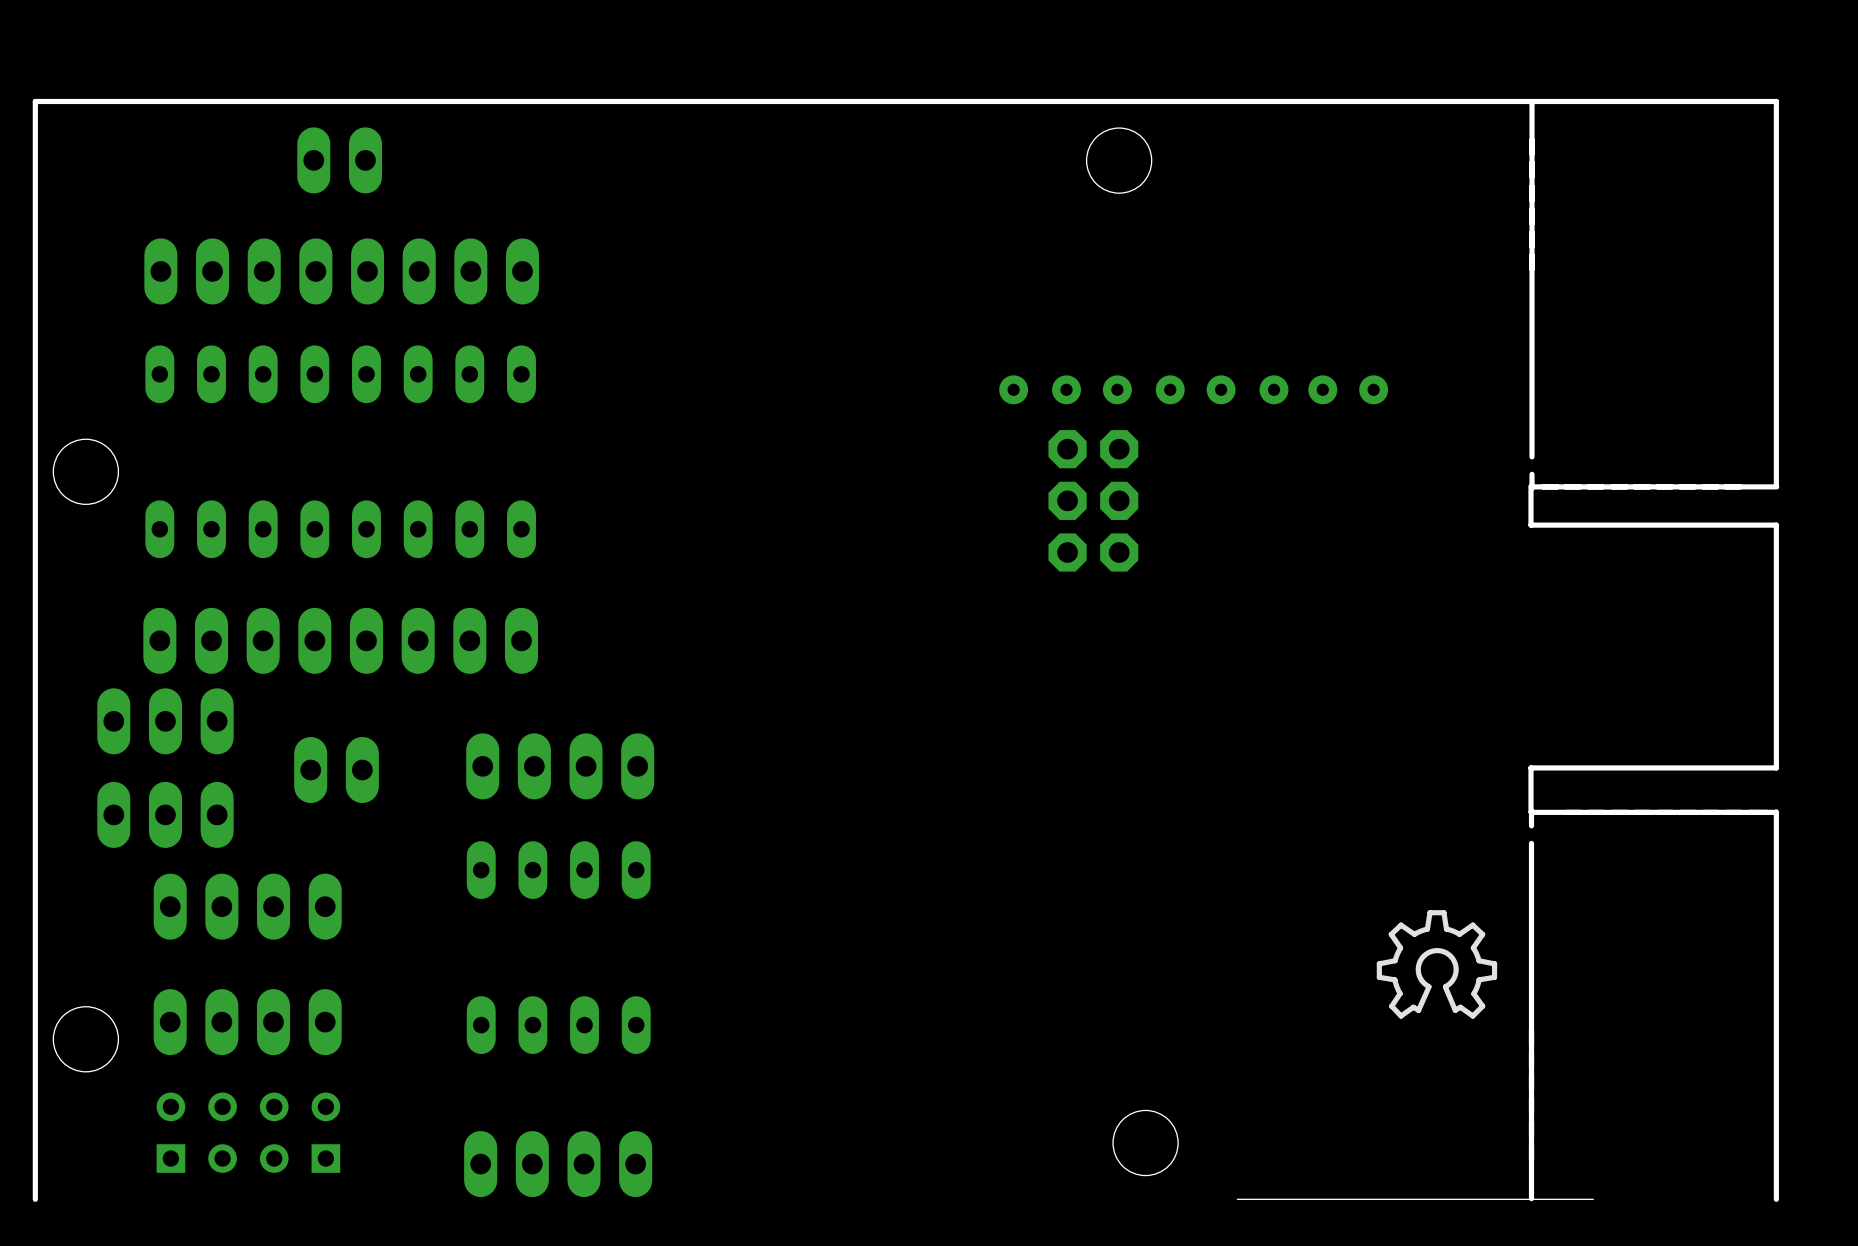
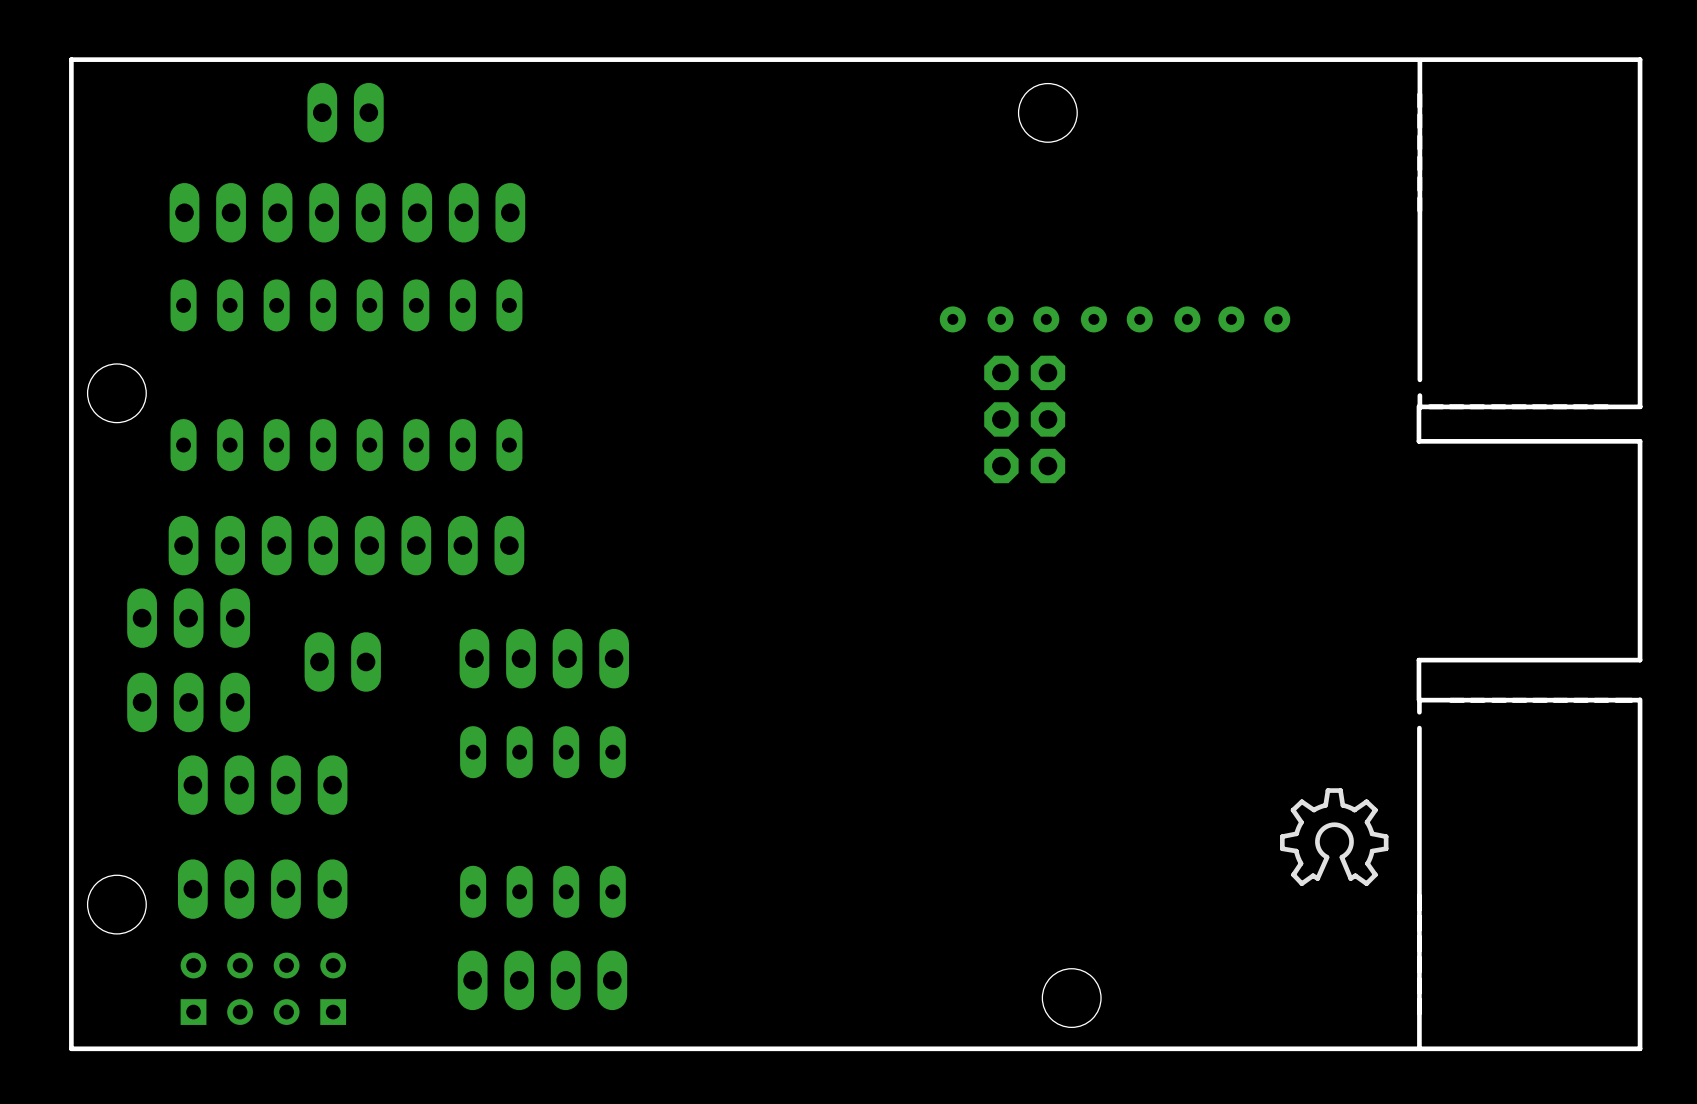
part position: (558, 1164) -> (542, 980)
board edge: none -> (1640, 1048) (71, 1048)

